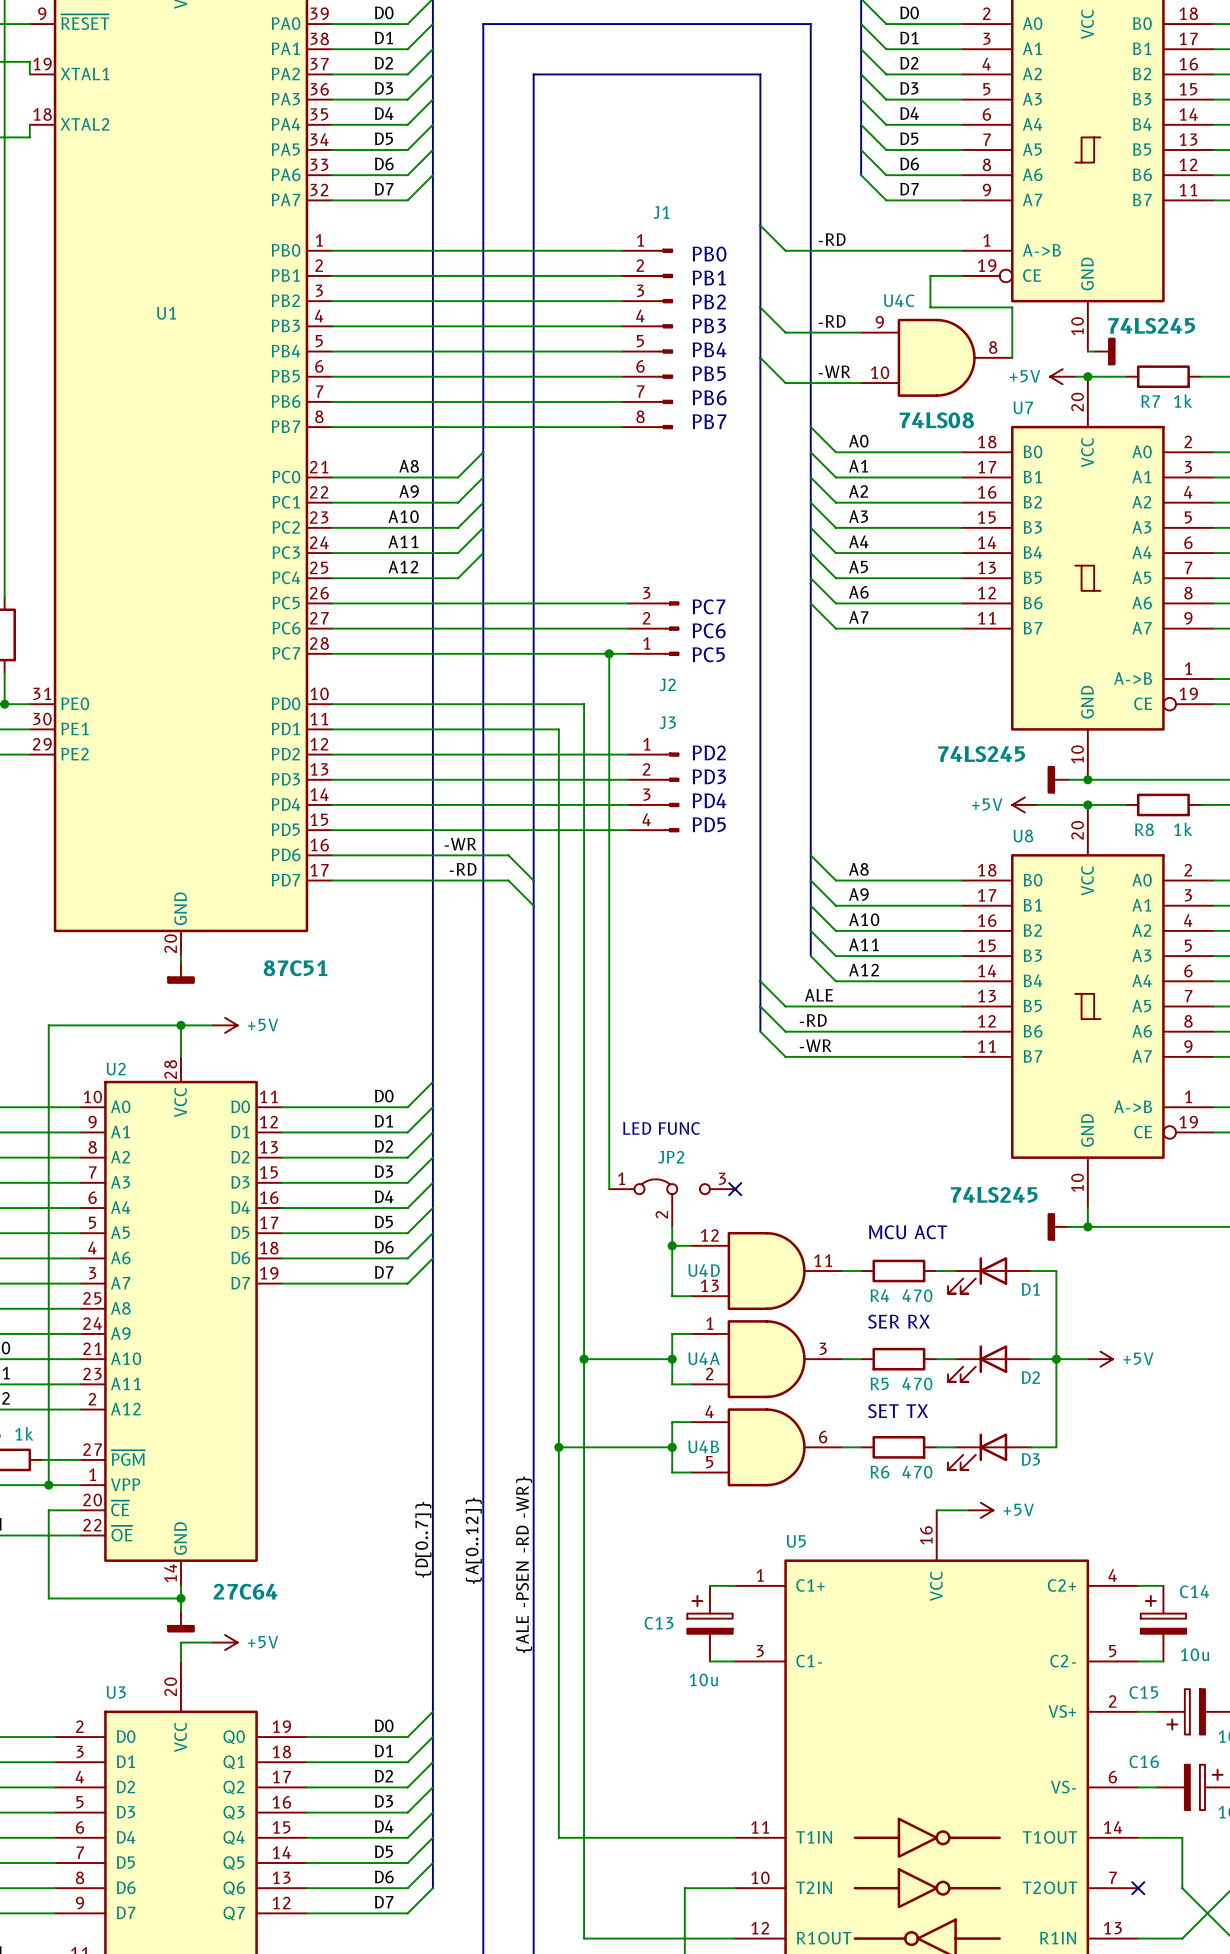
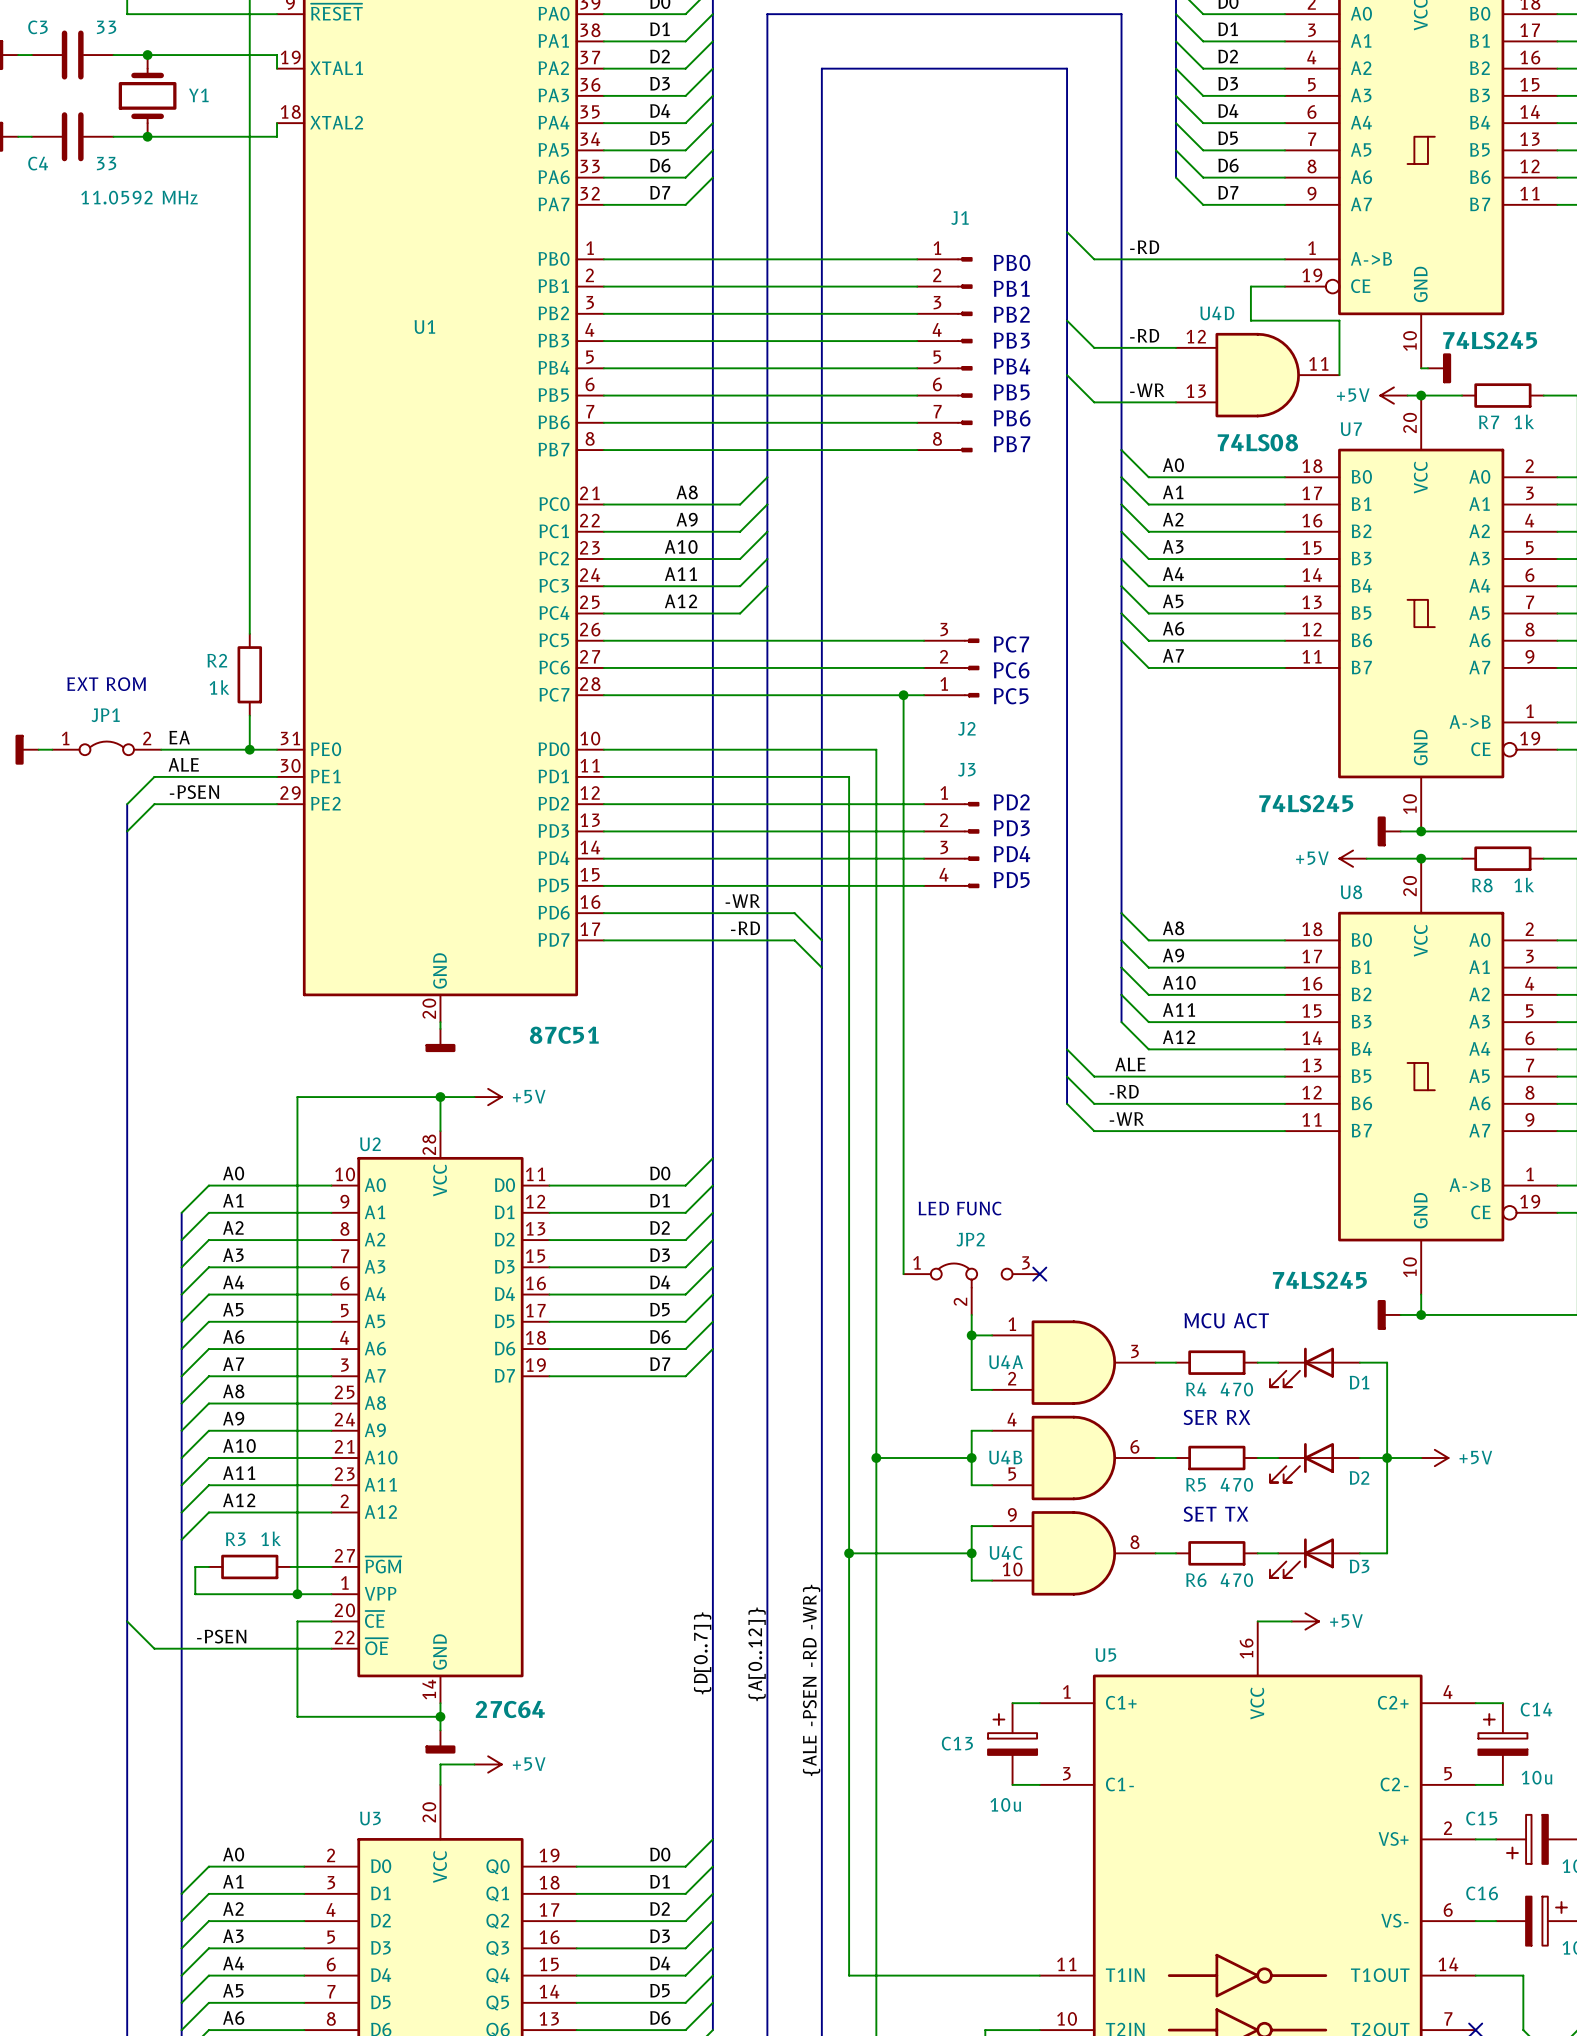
U4C name position: U4C (899, 300) -> U4C (1006, 1552)
U4C position: (936, 357) -> (1073, 1553)
U4D name position: U4D (704, 1270) -> U4D (1217, 313)
U4D position: (766, 1271) -> (1257, 375)
U4A position: (766, 1359) -> (1073, 1362)
U4B position: (766, 1447) -> (1073, 1458)

